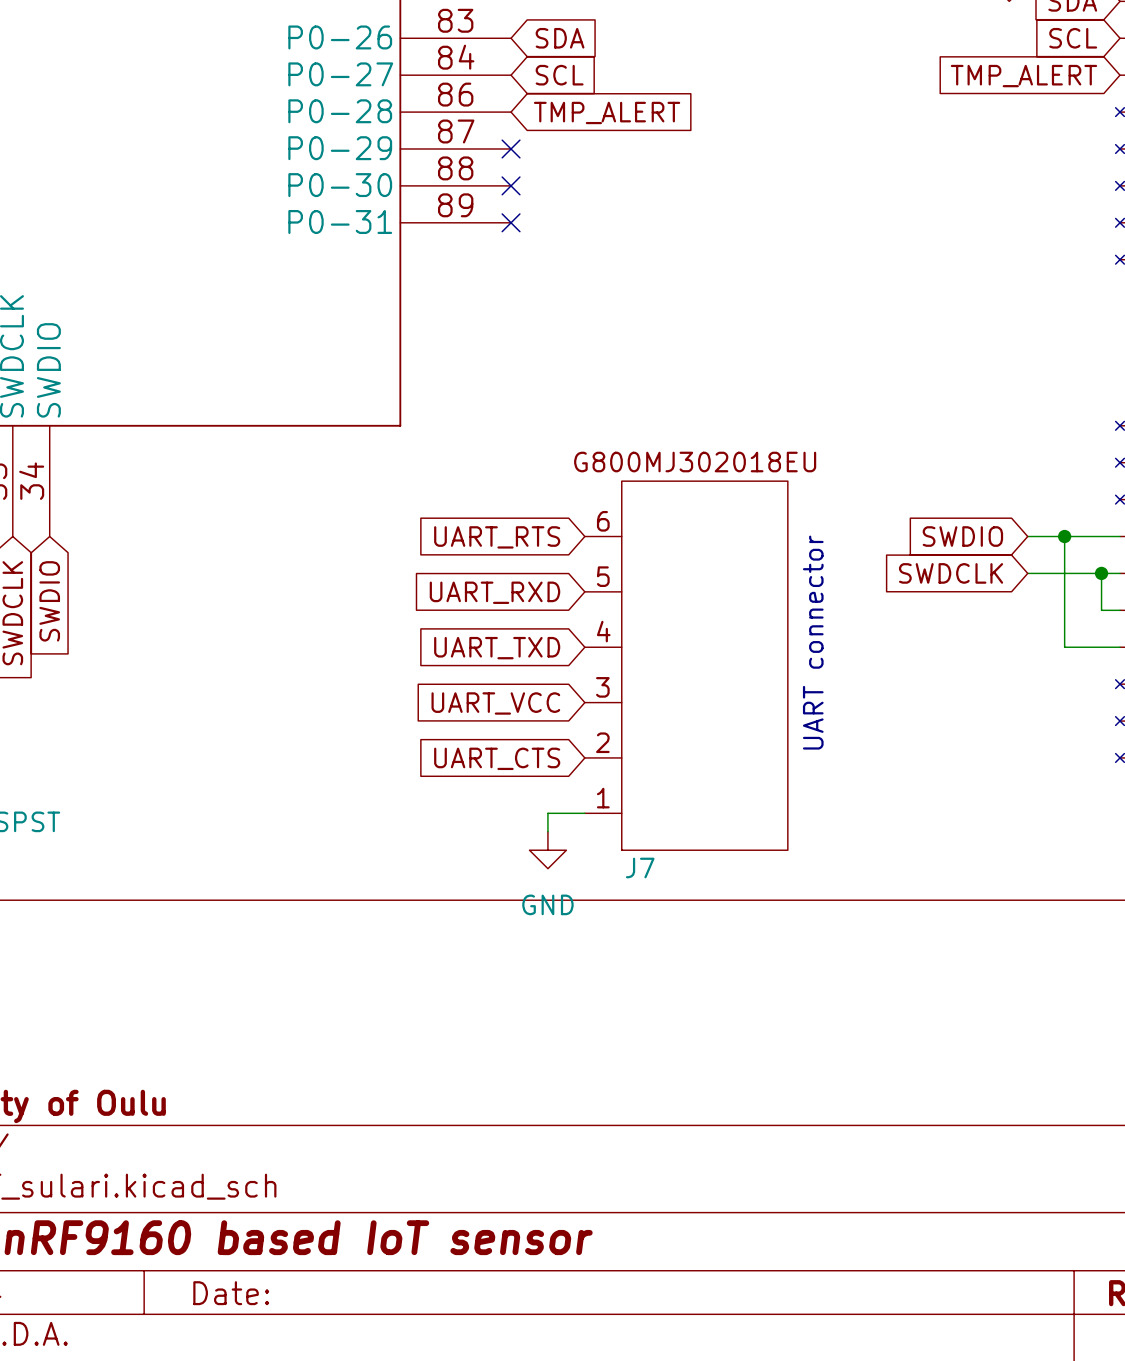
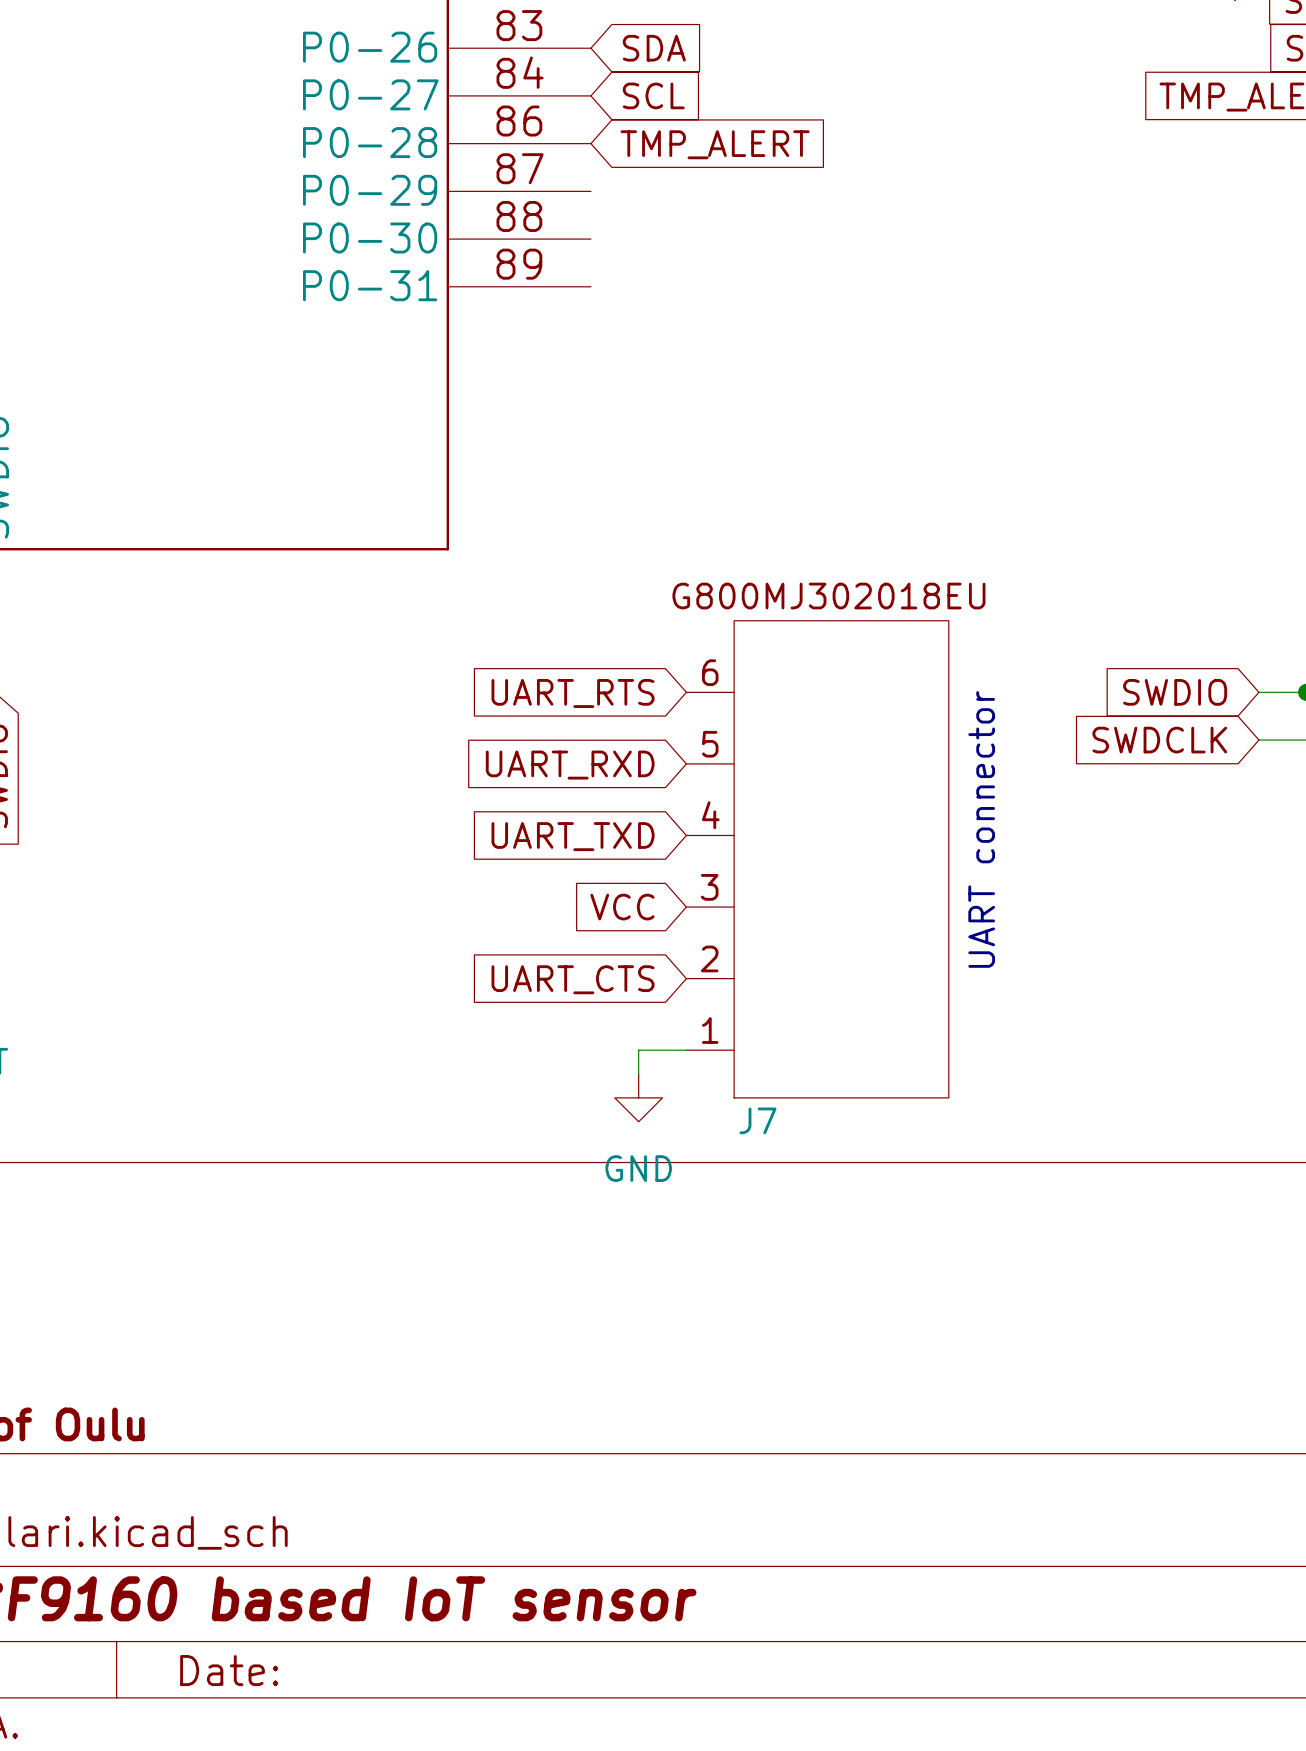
no-connect mark: (511, 148) -> none
no-connect mark: (511, 185) -> none
no-connect mark: (511, 222) -> none
global label: UART_VCC (495, 703) -> VCC (622, 907)

